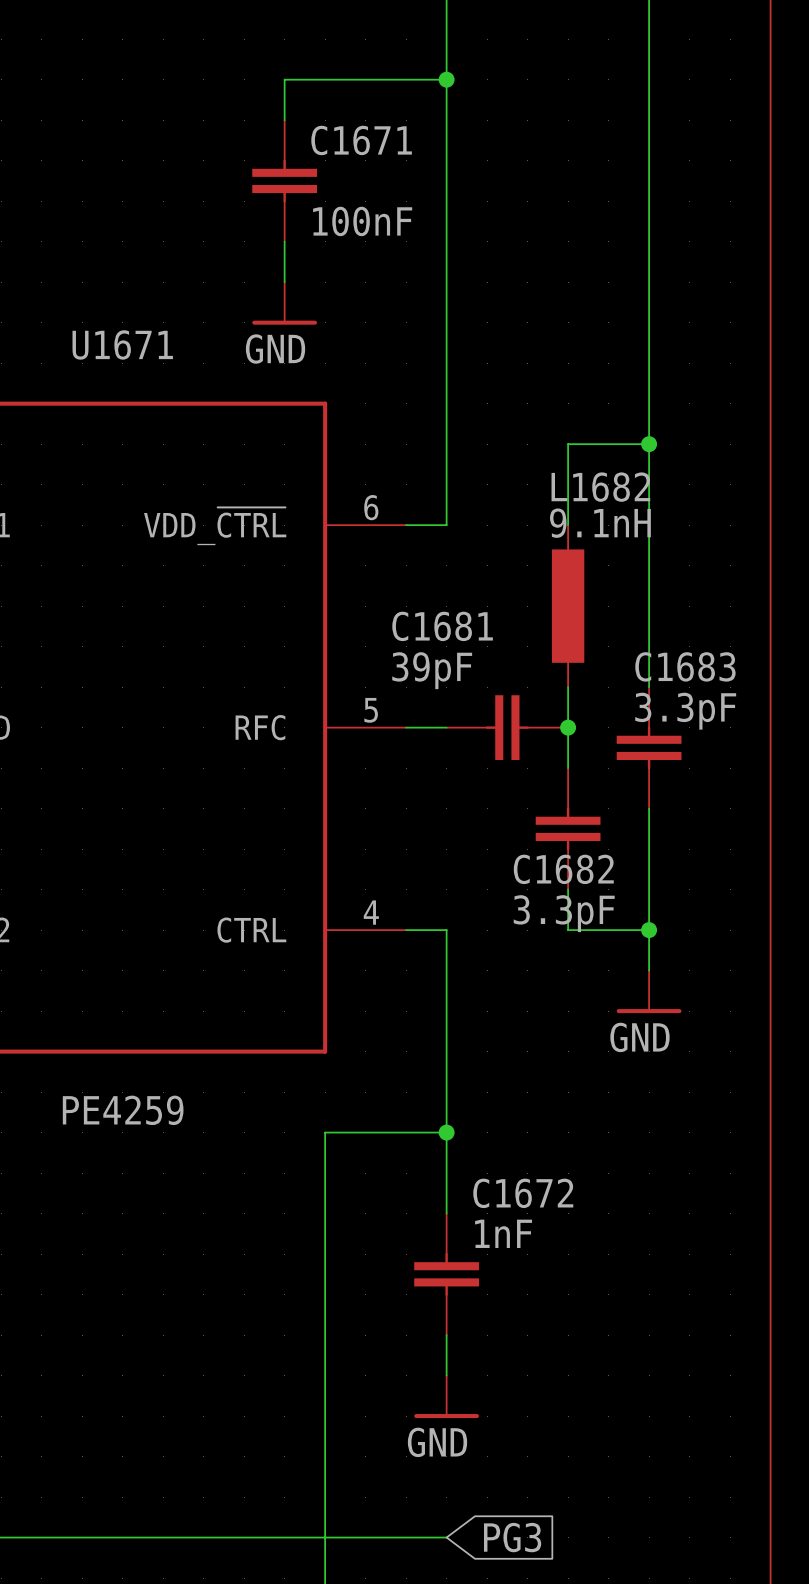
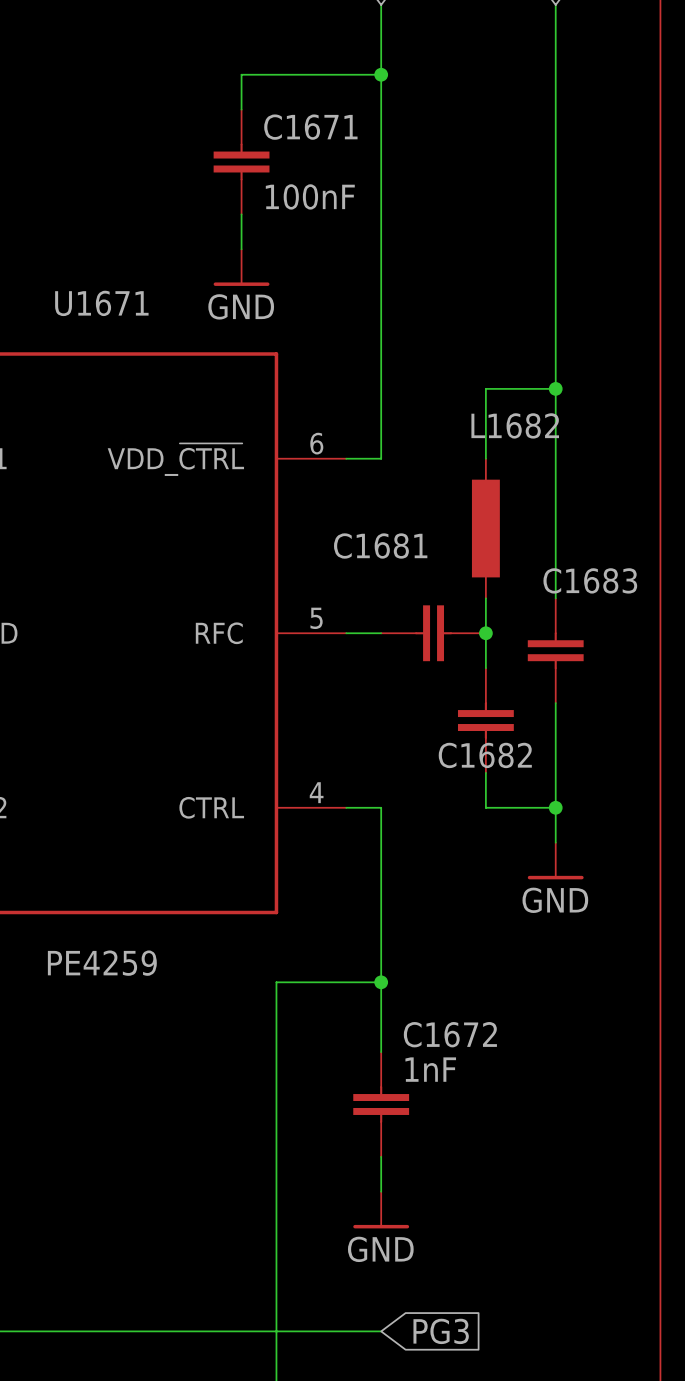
L1682 value: 9.1nH (600, 523) -> none
C1681 value: 39pF (432, 670) -> none
C1683 value: 3.3pF (685, 711) -> none
C1682 value: 3.3pF (564, 913) -> none

